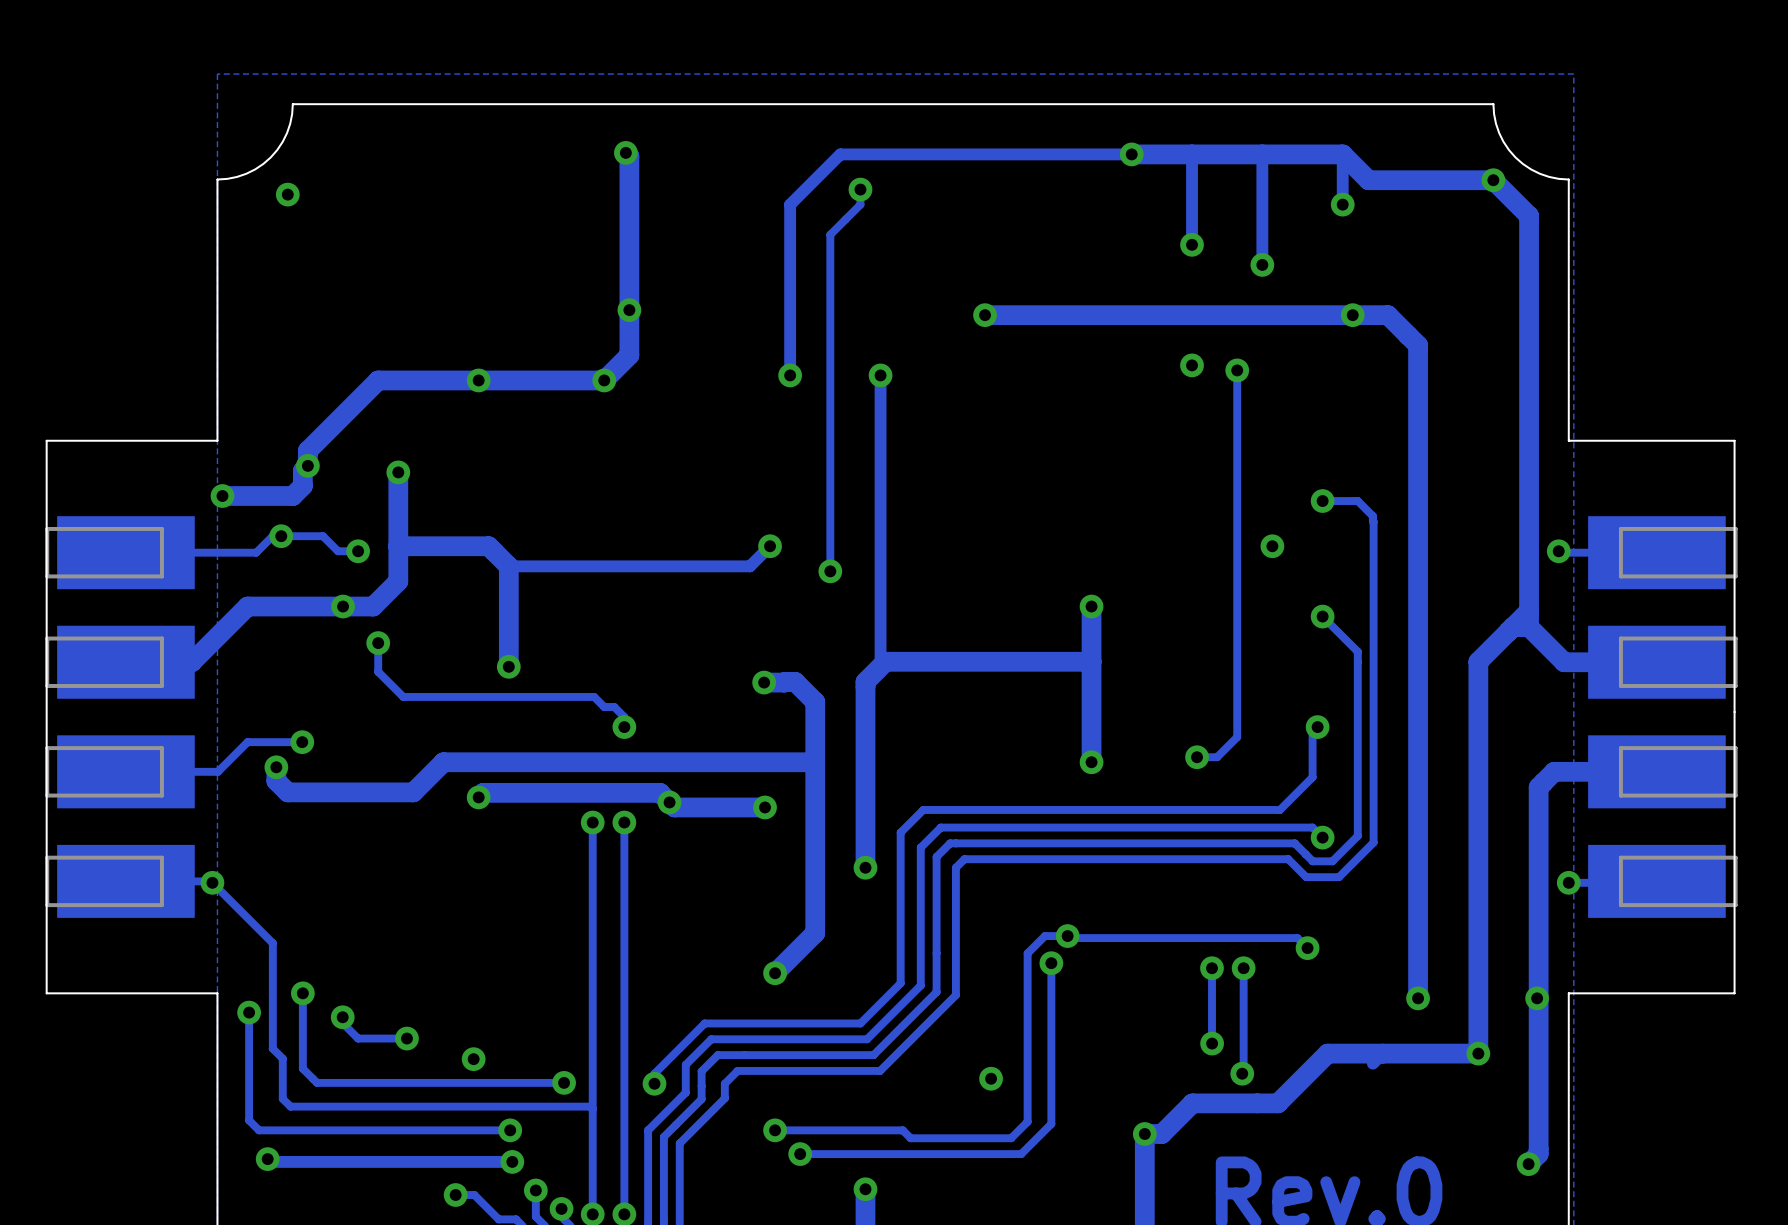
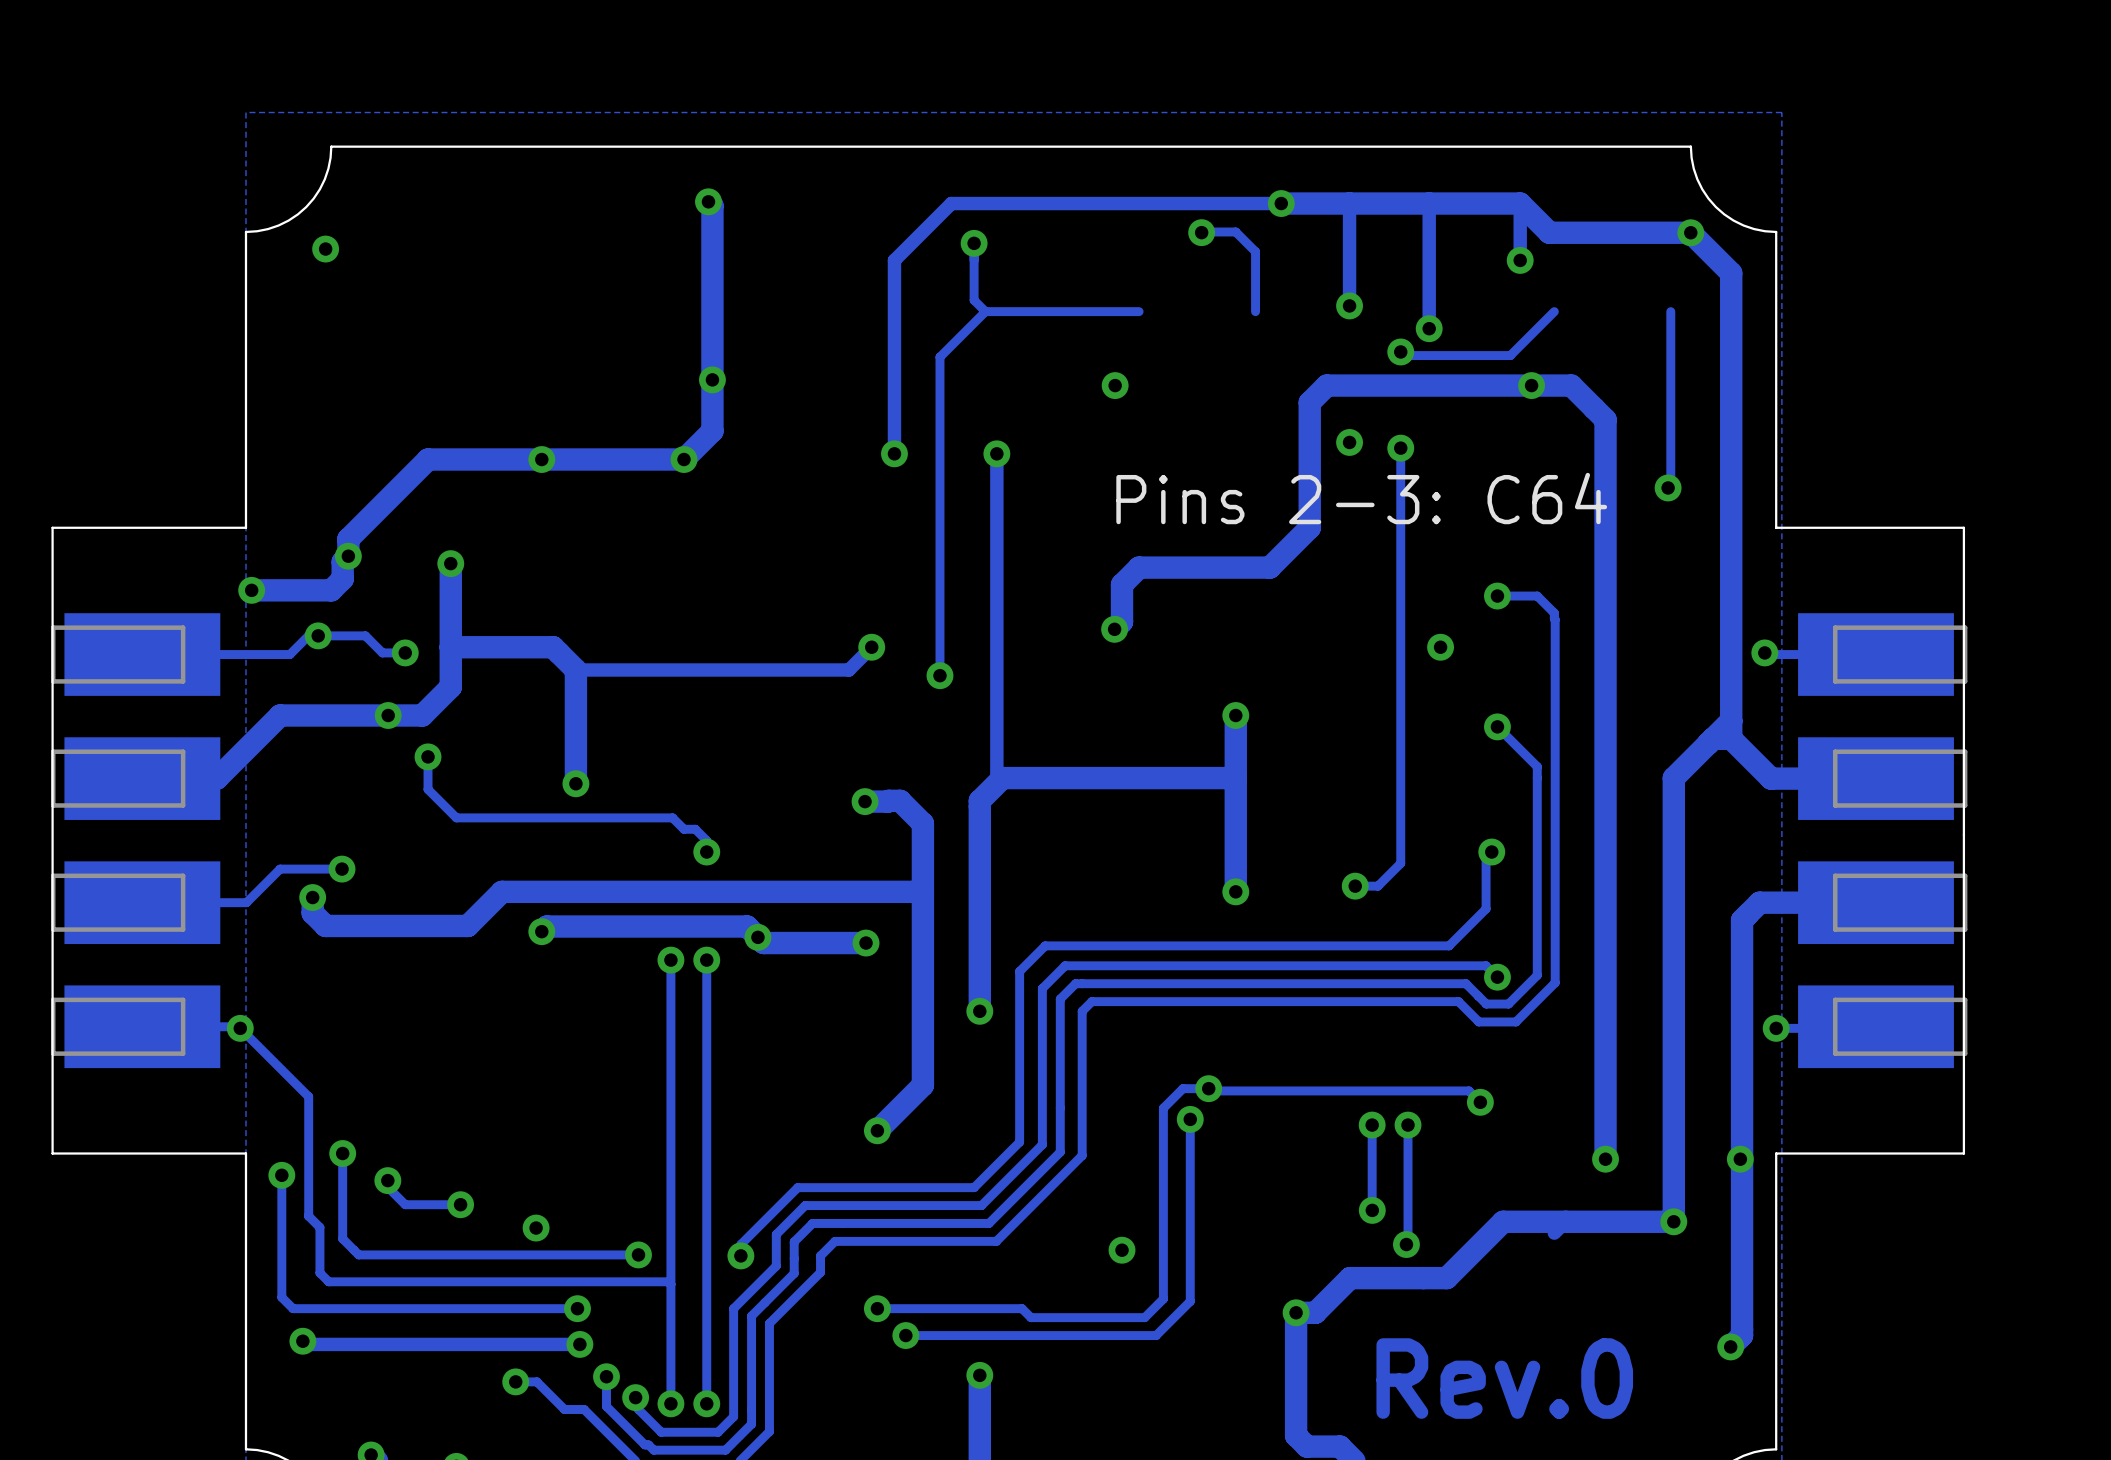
track: none -> (1201, 232) (1235, 231) (1255, 251) (1255, 311)
via: none -> (1201, 232)
track: (860, 204) (830, 234) (830, 290) -> (985, 311) (939, 357)
track: none -> (974, 260) (974, 300) (985, 311)
track: none -> (1139, 311) (985, 311)
track: none -> (1554, 311) (1510, 355) (1404, 355) (1400, 351)
track: none -> (1670, 311) (1670, 485) (1668, 487)
via: none -> (1400, 351)
track: (1171, 315) (985, 315) -> (1326, 385) (1309, 402) (1309, 527) (1269, 567) (1139, 567) (1122, 584) (1122, 621) (1114, 629)
via: none -> (1668, 487)
text: none -> Pins 2-3: C64 (1361, 498)
via: none -> (1114, 629)

